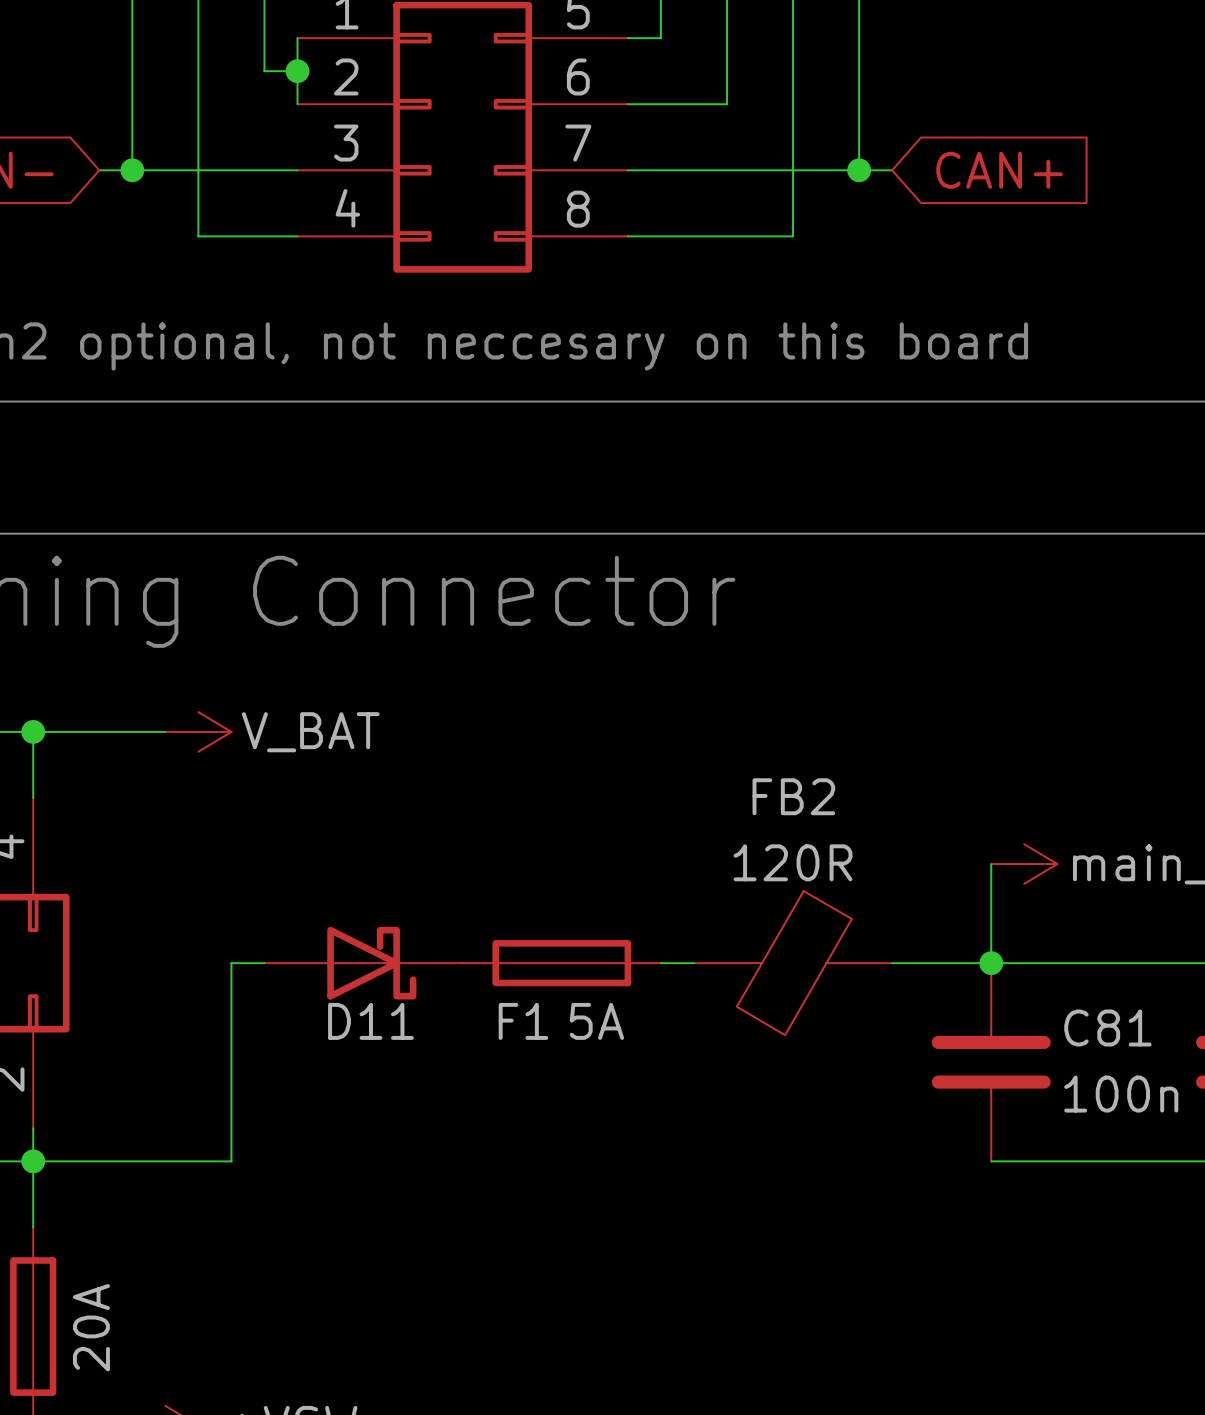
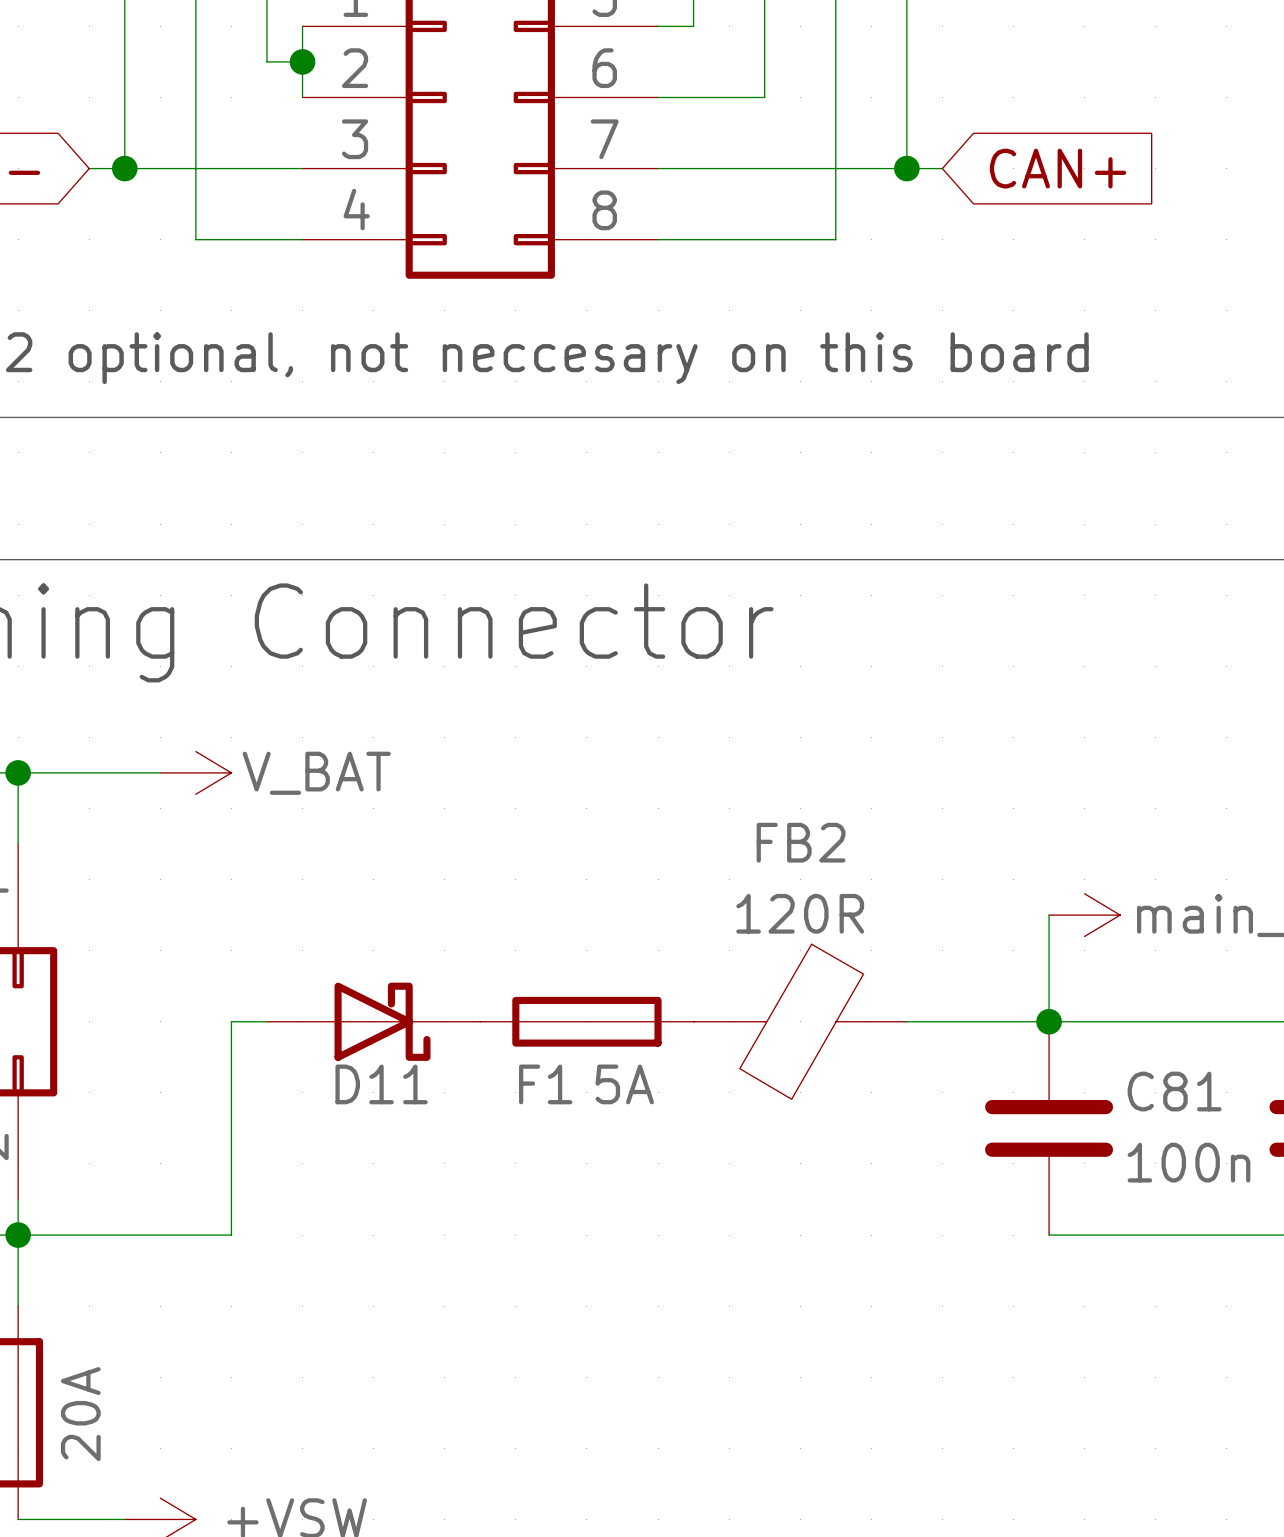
FB2 position: (793, 963) -> (800, 1021)

